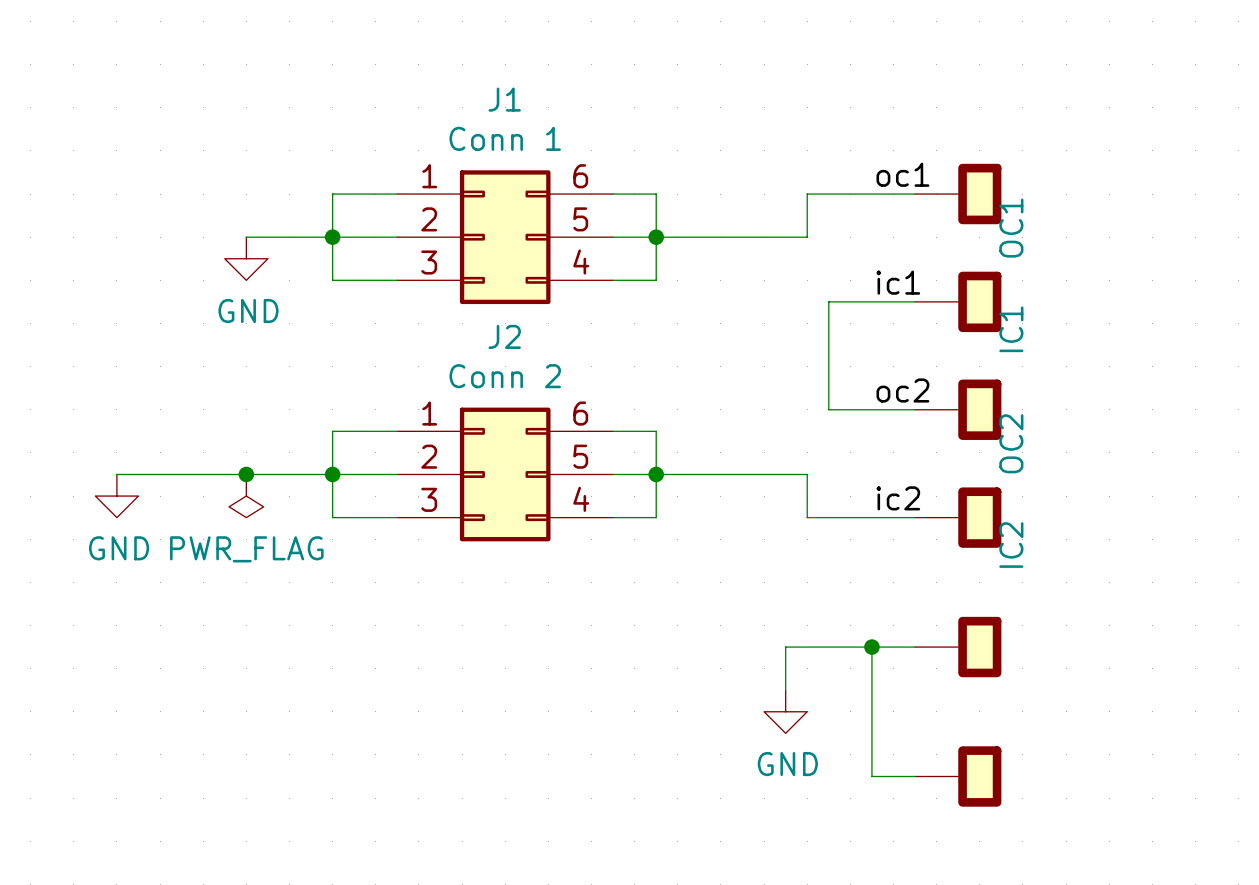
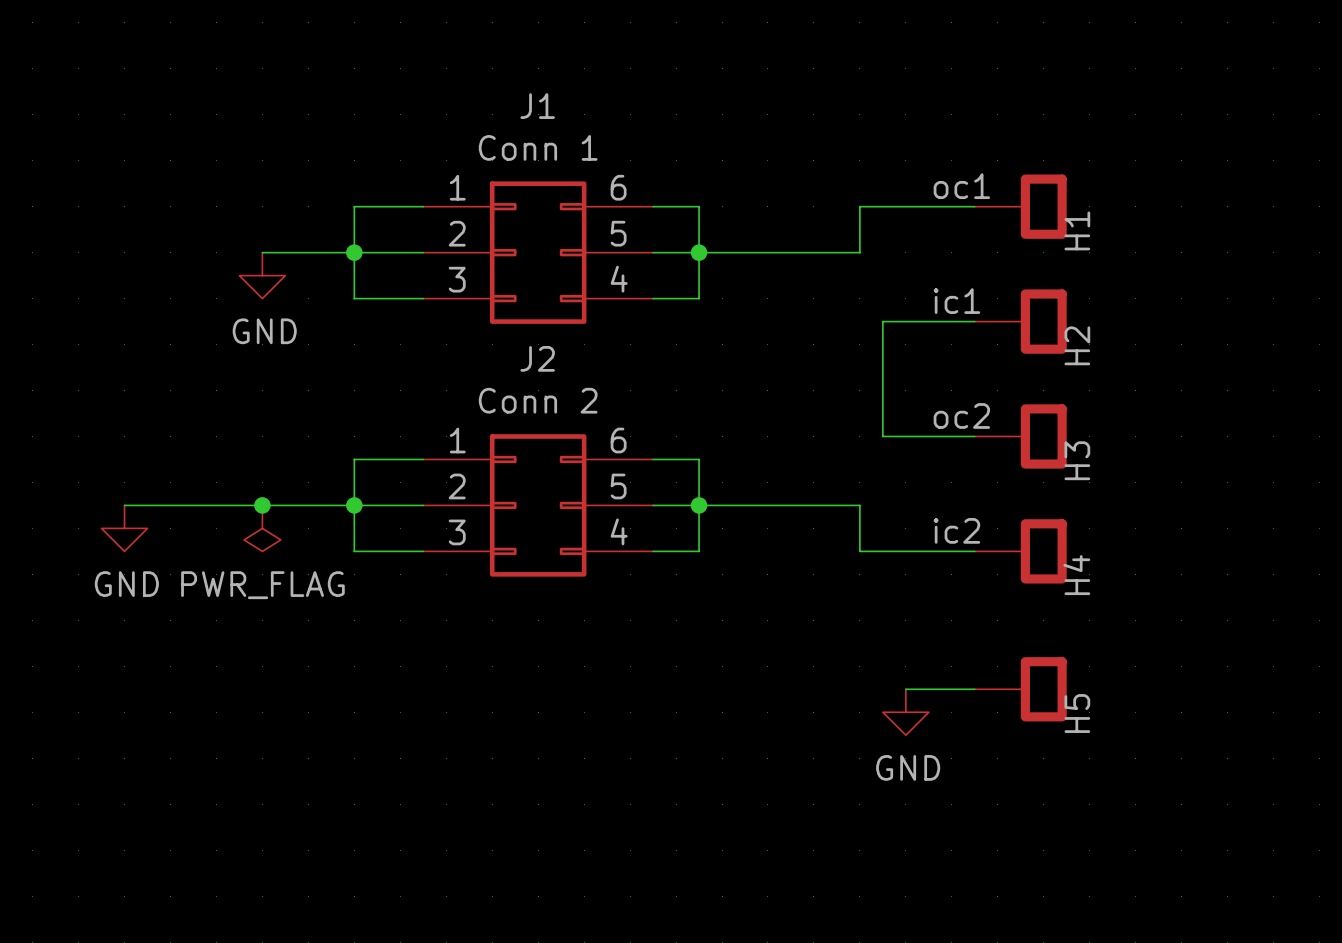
OC1 name: OC1 (1011, 228) -> H1 (1077, 230)
IC1 name: IC1 (1011, 329) -> H2 (1077, 345)
OC2 name: OC2 (1011, 443) -> H3 (1077, 460)
IC2 name: IC2 (1011, 545) -> H4 (1076, 575)
wire: (850, 647) (785, 647) (785, 690) -> none
wire: (871, 647) (871, 776) (915, 776) -> none
junction: (871, 647) -> none
H5 name: none -> H5 (1077, 713)
power symbol position: GND (785, 711) -> GND (905, 712)
part: (958, 776) -> none

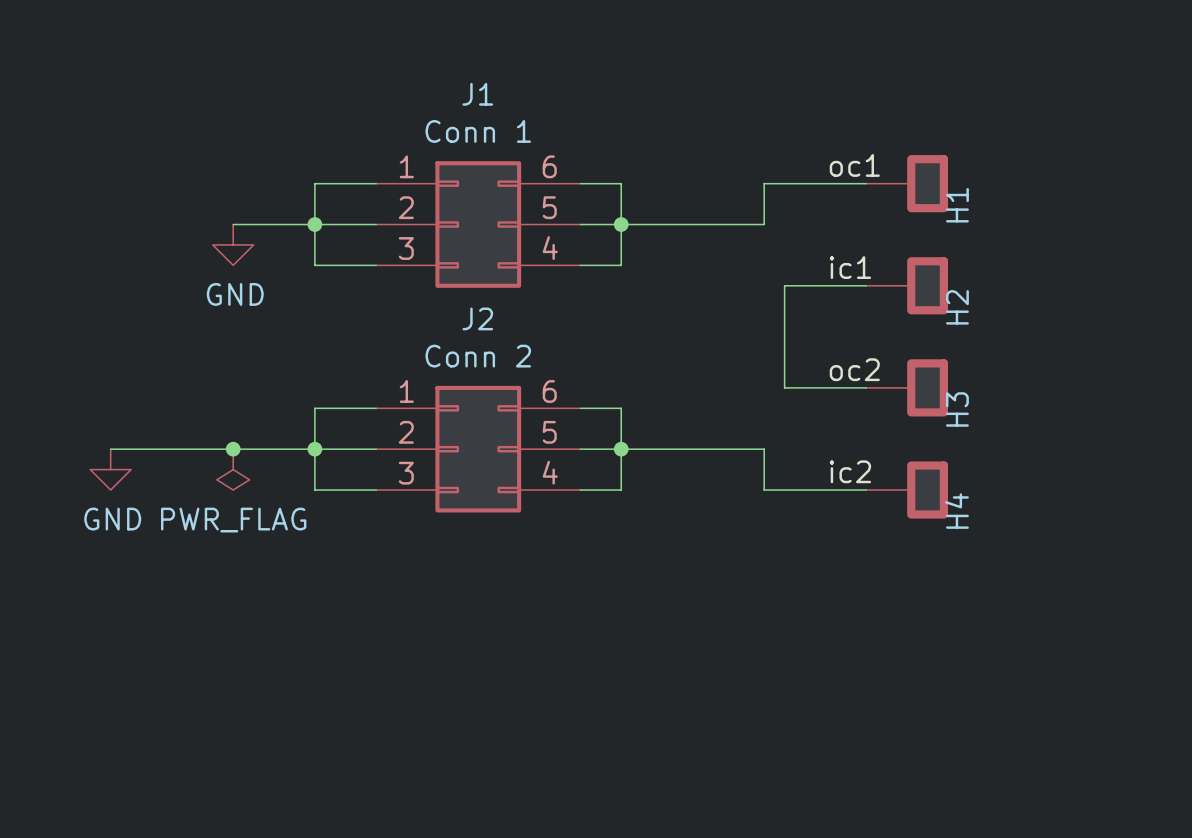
wire: (905, 689) (974, 689) -> none
H5: (1020, 689) -> none
power symbol: GND (905, 712) -> none

